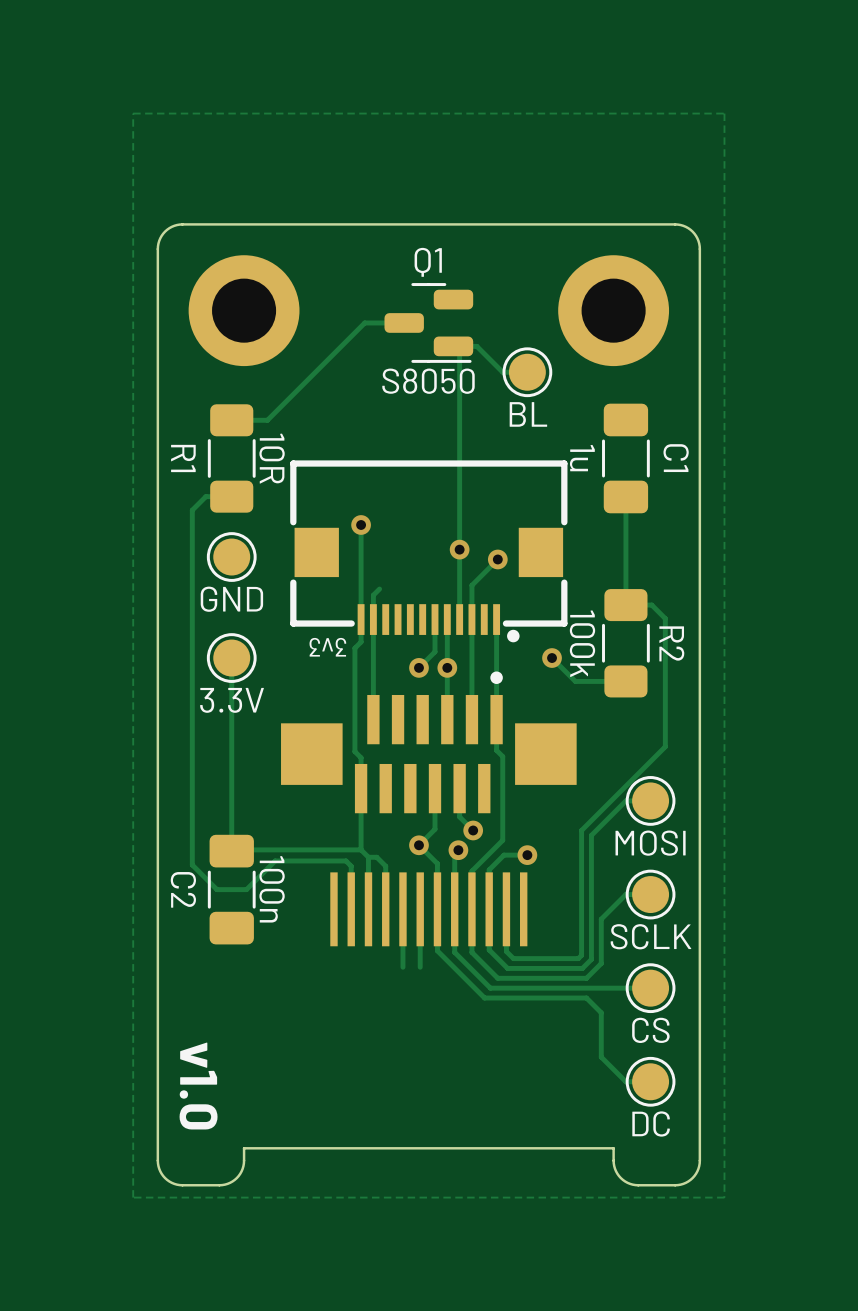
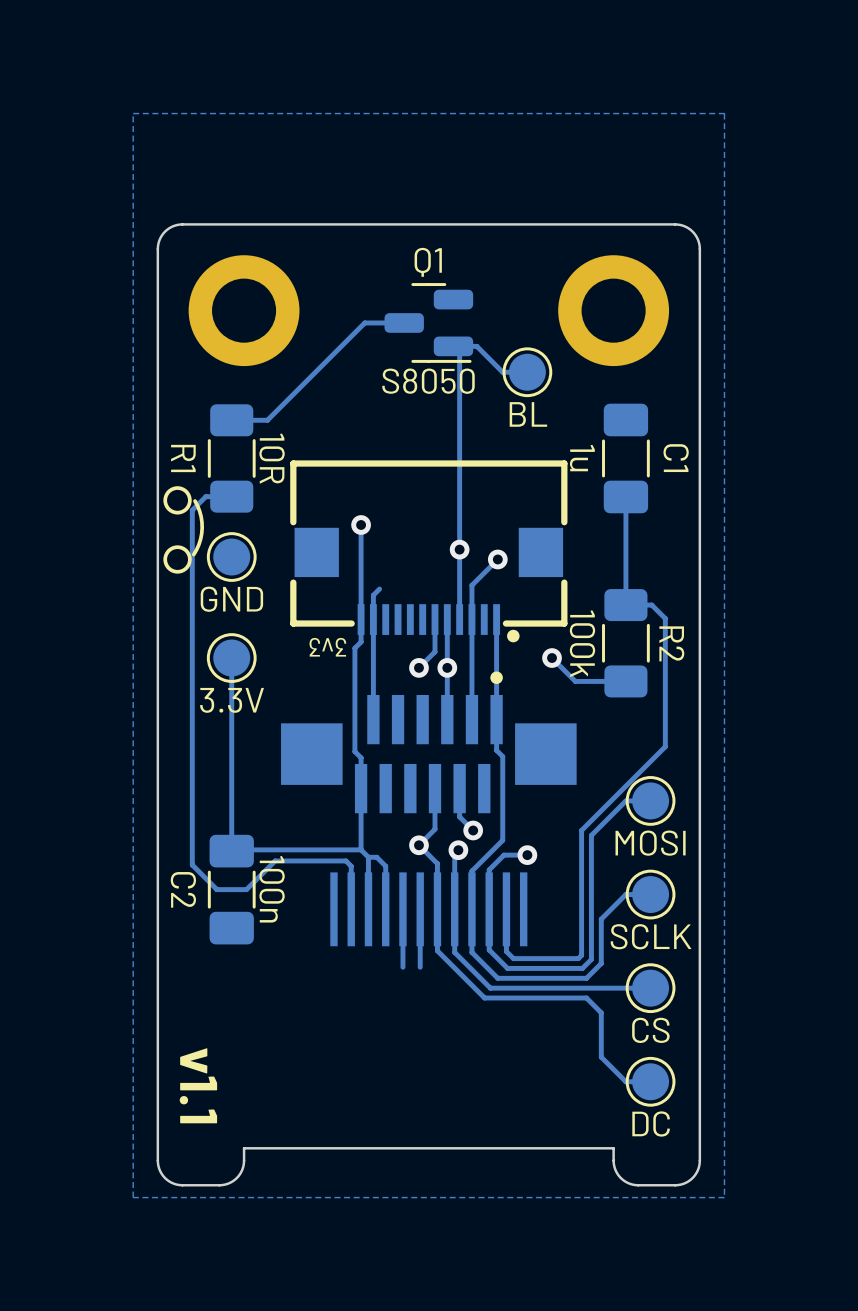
drawing: none -> [163, 486, 192, 515]
line: none -> (195, 501) (199, 511) (202, 527) (200, 539) (193, 554)
drawing: none -> [163, 545, 192, 574]
text: v1.0 (198, 1086) -> v1.1 (198, 1085)

